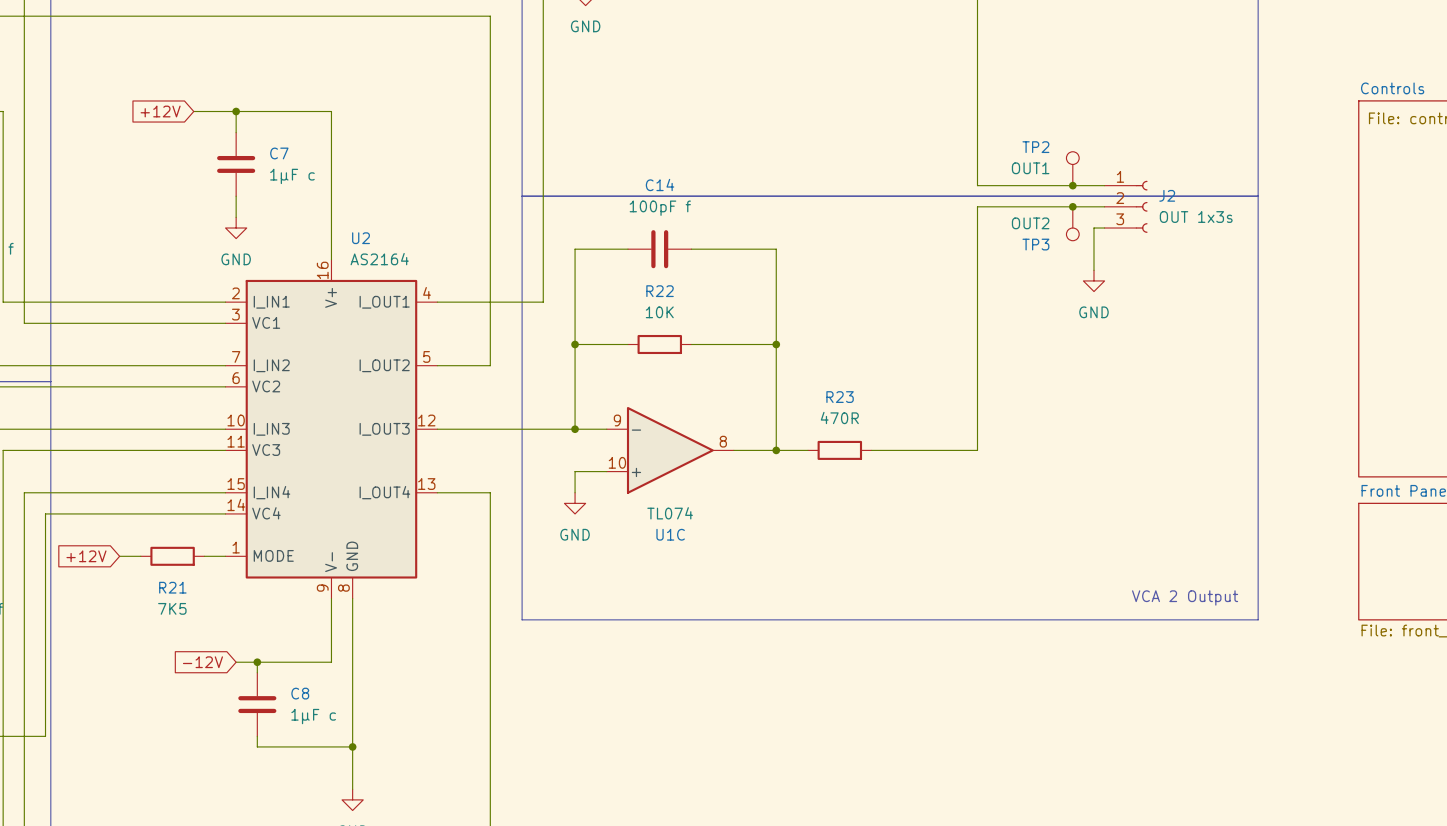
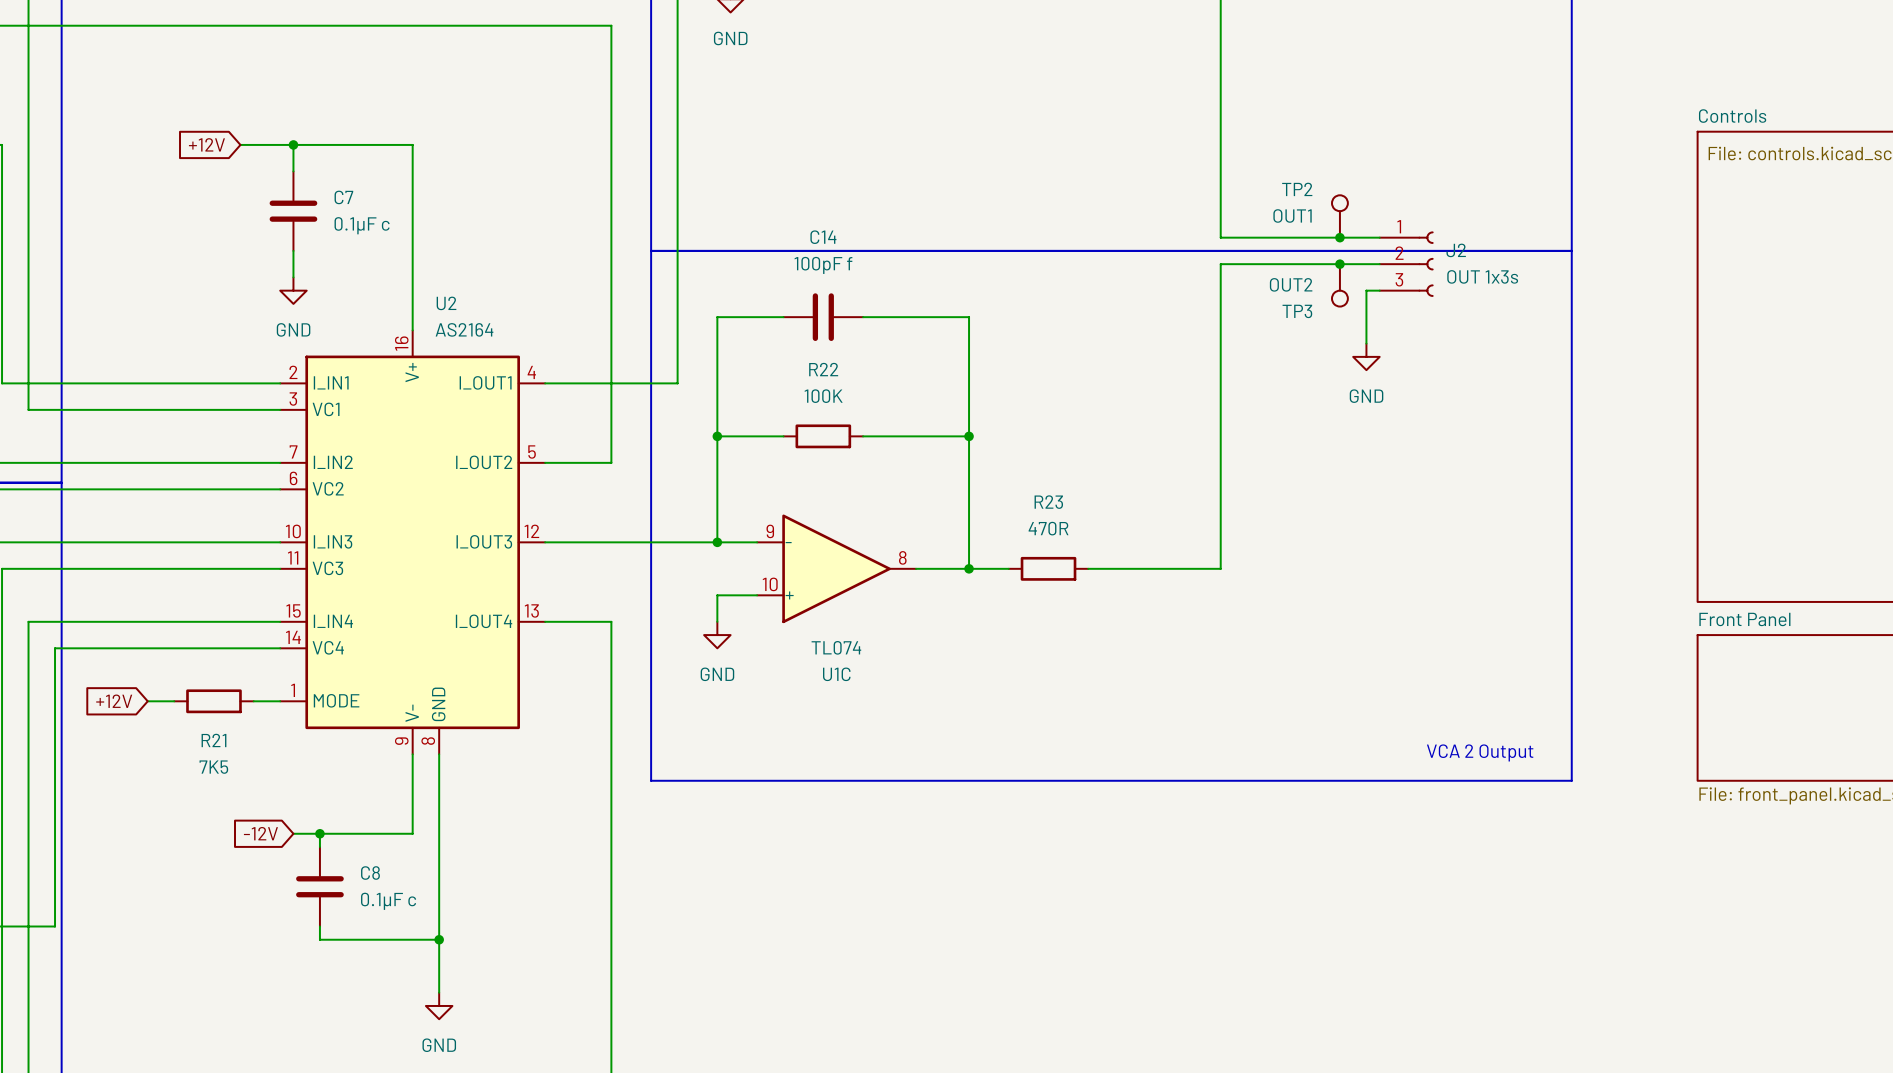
C7 value: 1μF c (292, 176) -> 0.1μF c (362, 225)
R22 value: 10K (659, 312) -> 100K (823, 396)
C8 value: 1μF c (313, 716) -> 0.1μF c (388, 901)

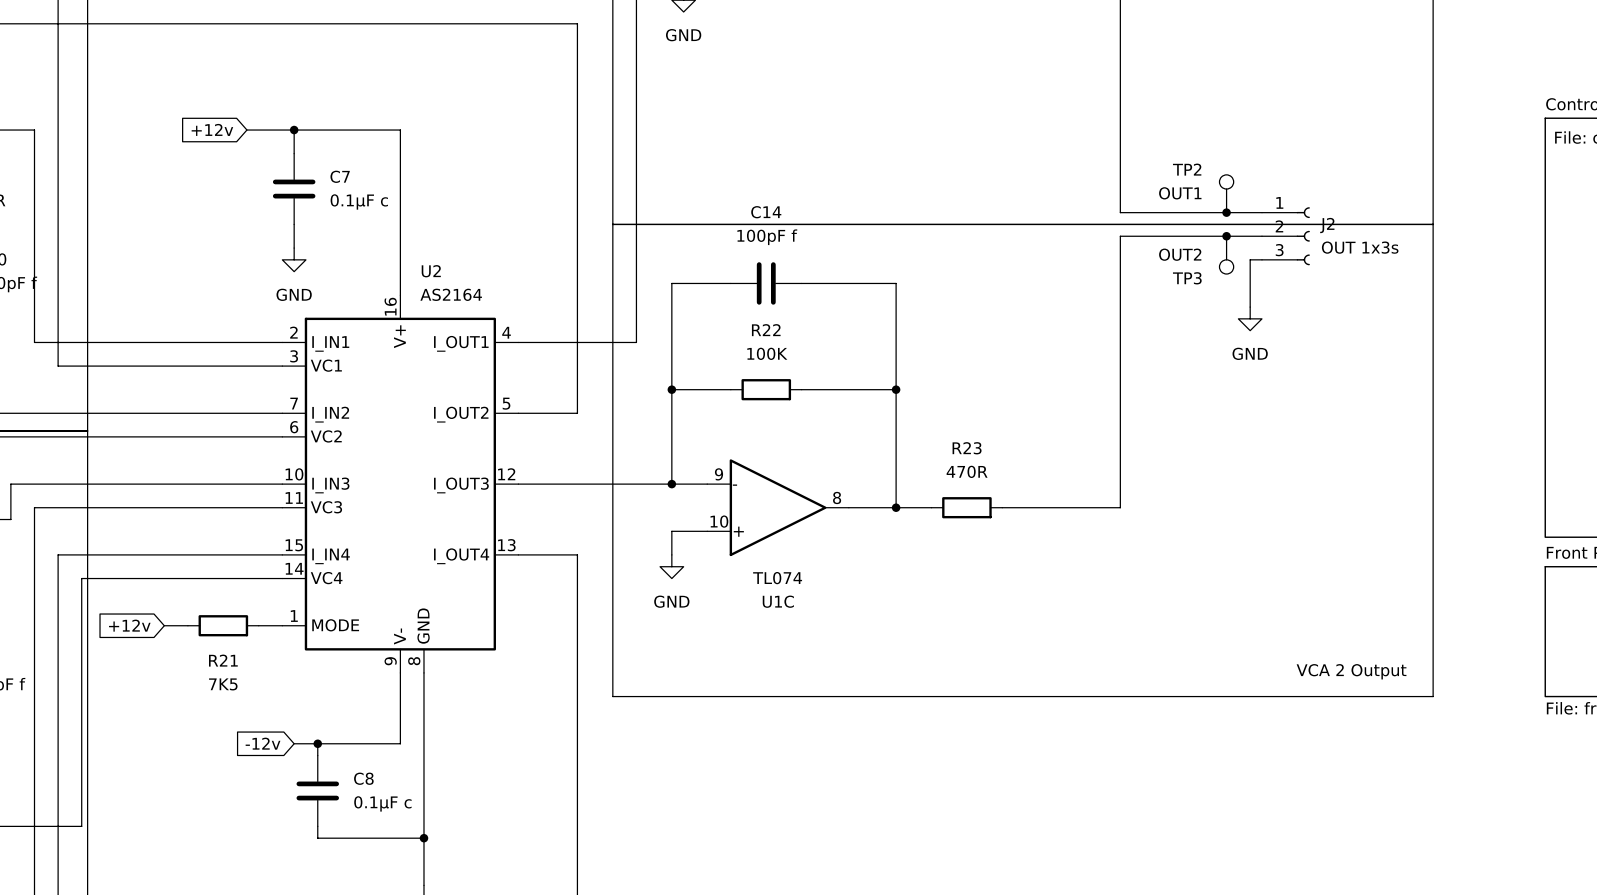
global label: +12V (206, 144) -> +12v (212, 129)
global label: +12V (114, 701) -> +12v (129, 625)
global label: -12V (260, 833) -> -12v (263, 743)

